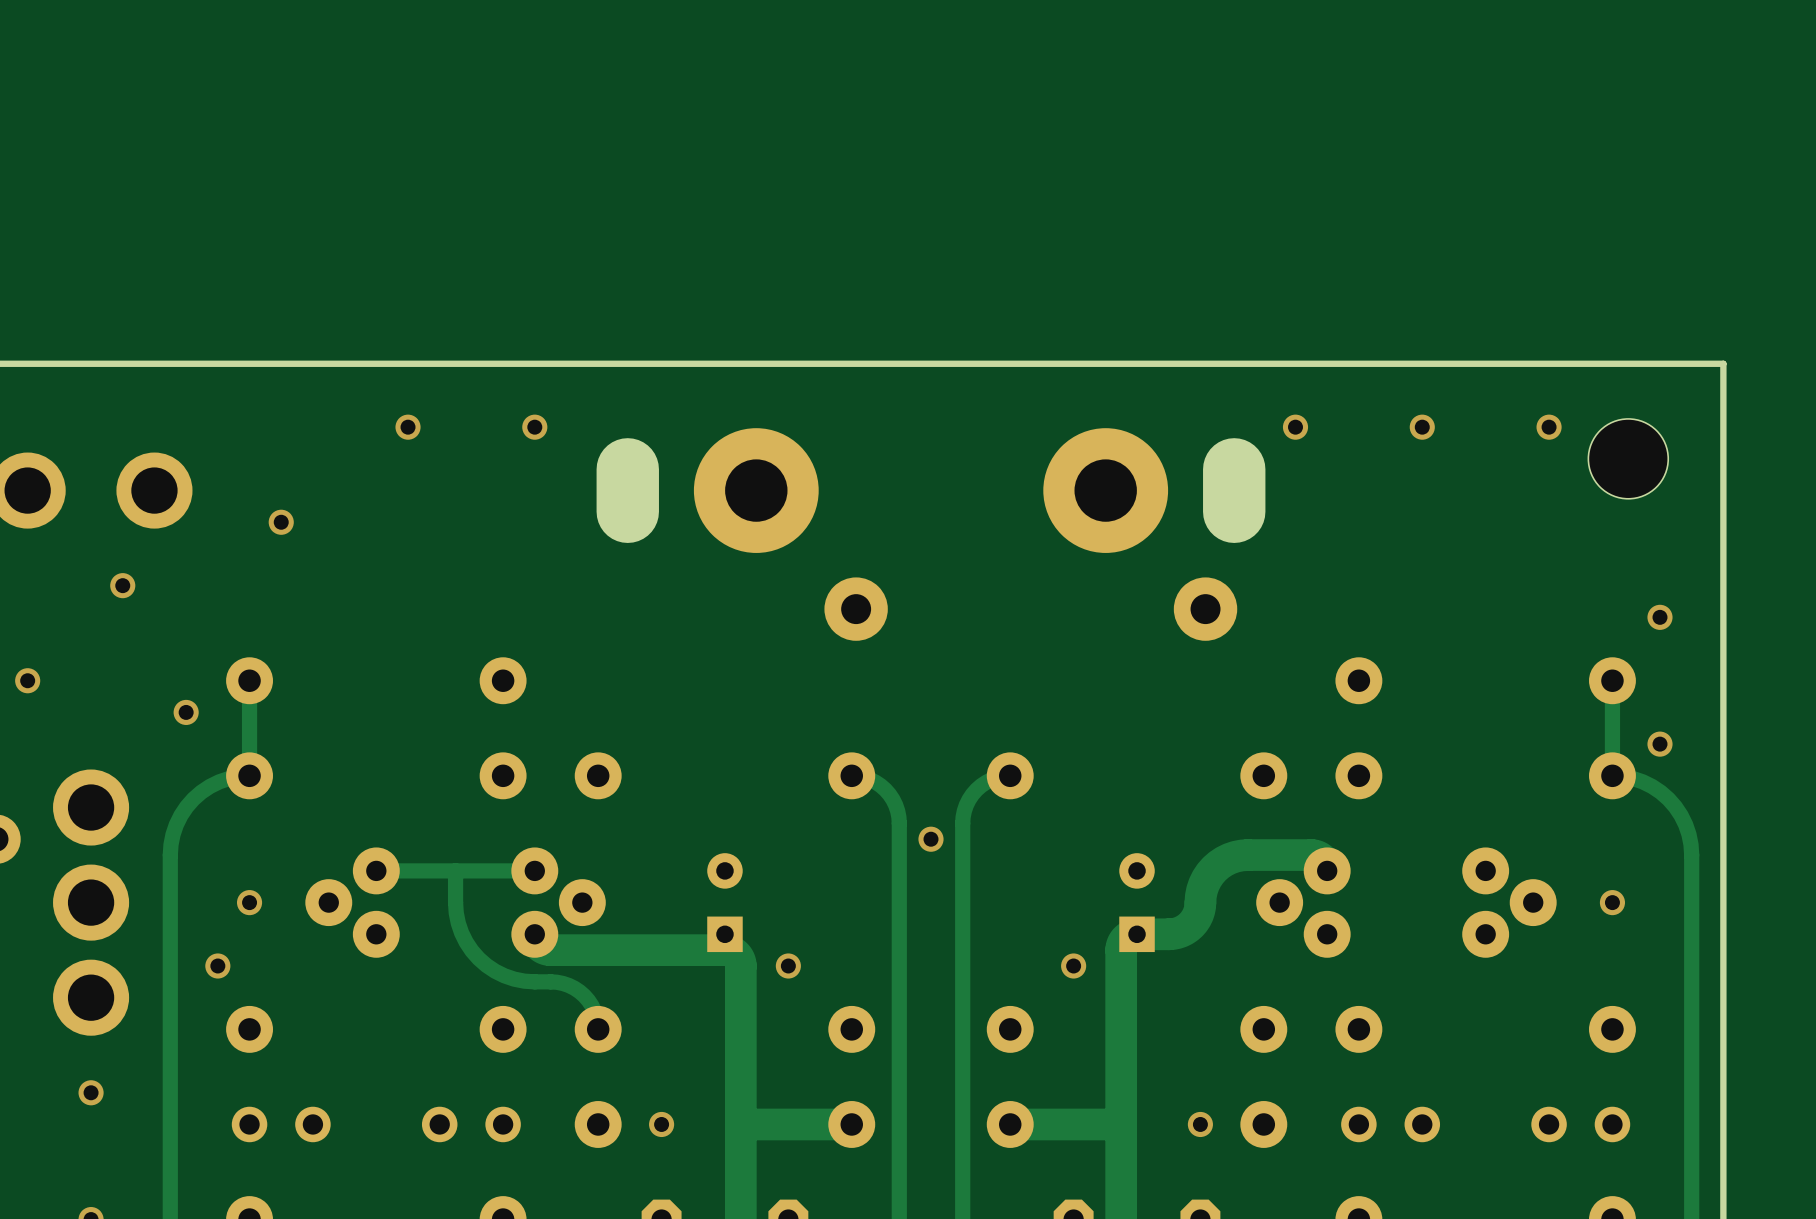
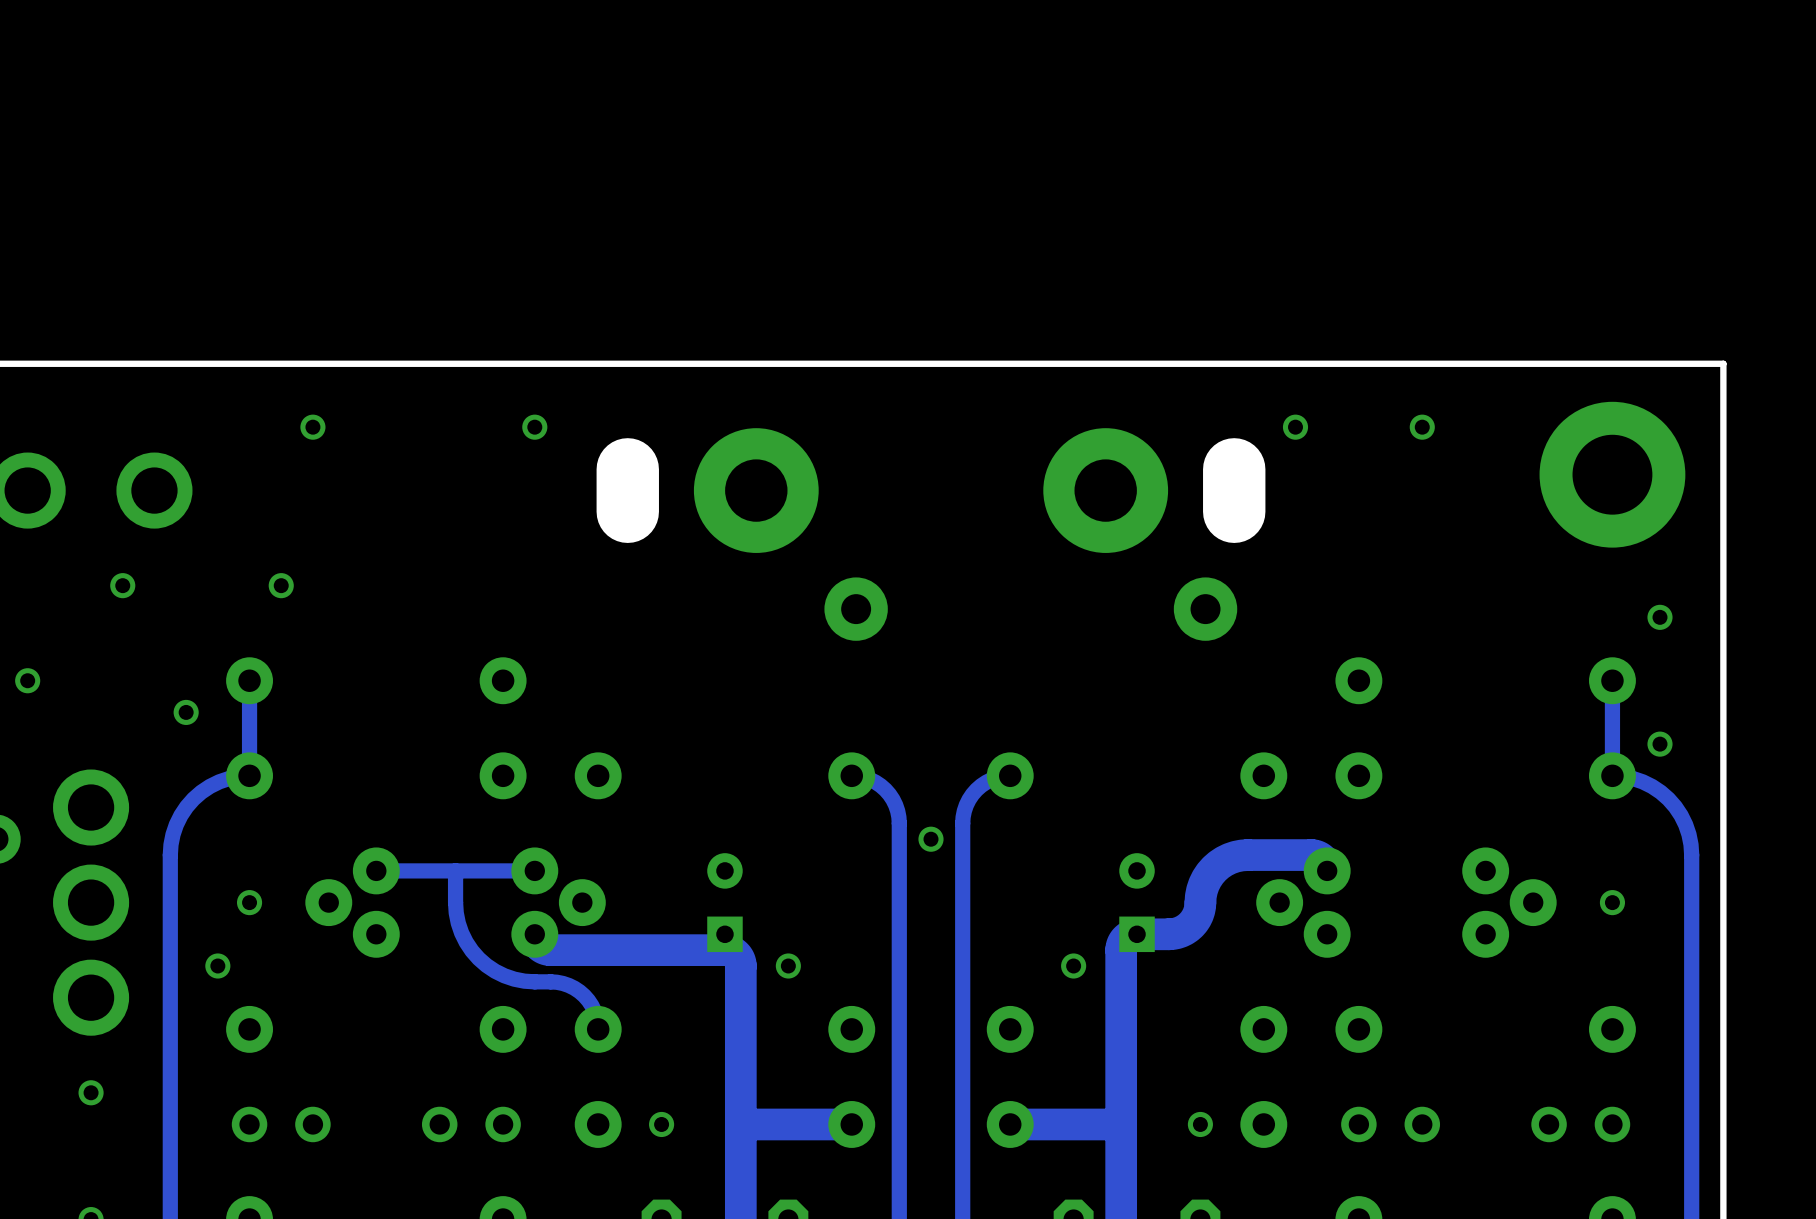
via: none -> (312, 427)
via: (408, 427) -> none
via: (1549, 427) -> none
hole: (1628, 458) -> none
part: none -> (1612, 474)
via: (281, 522) -> none
via: none -> (281, 585)

